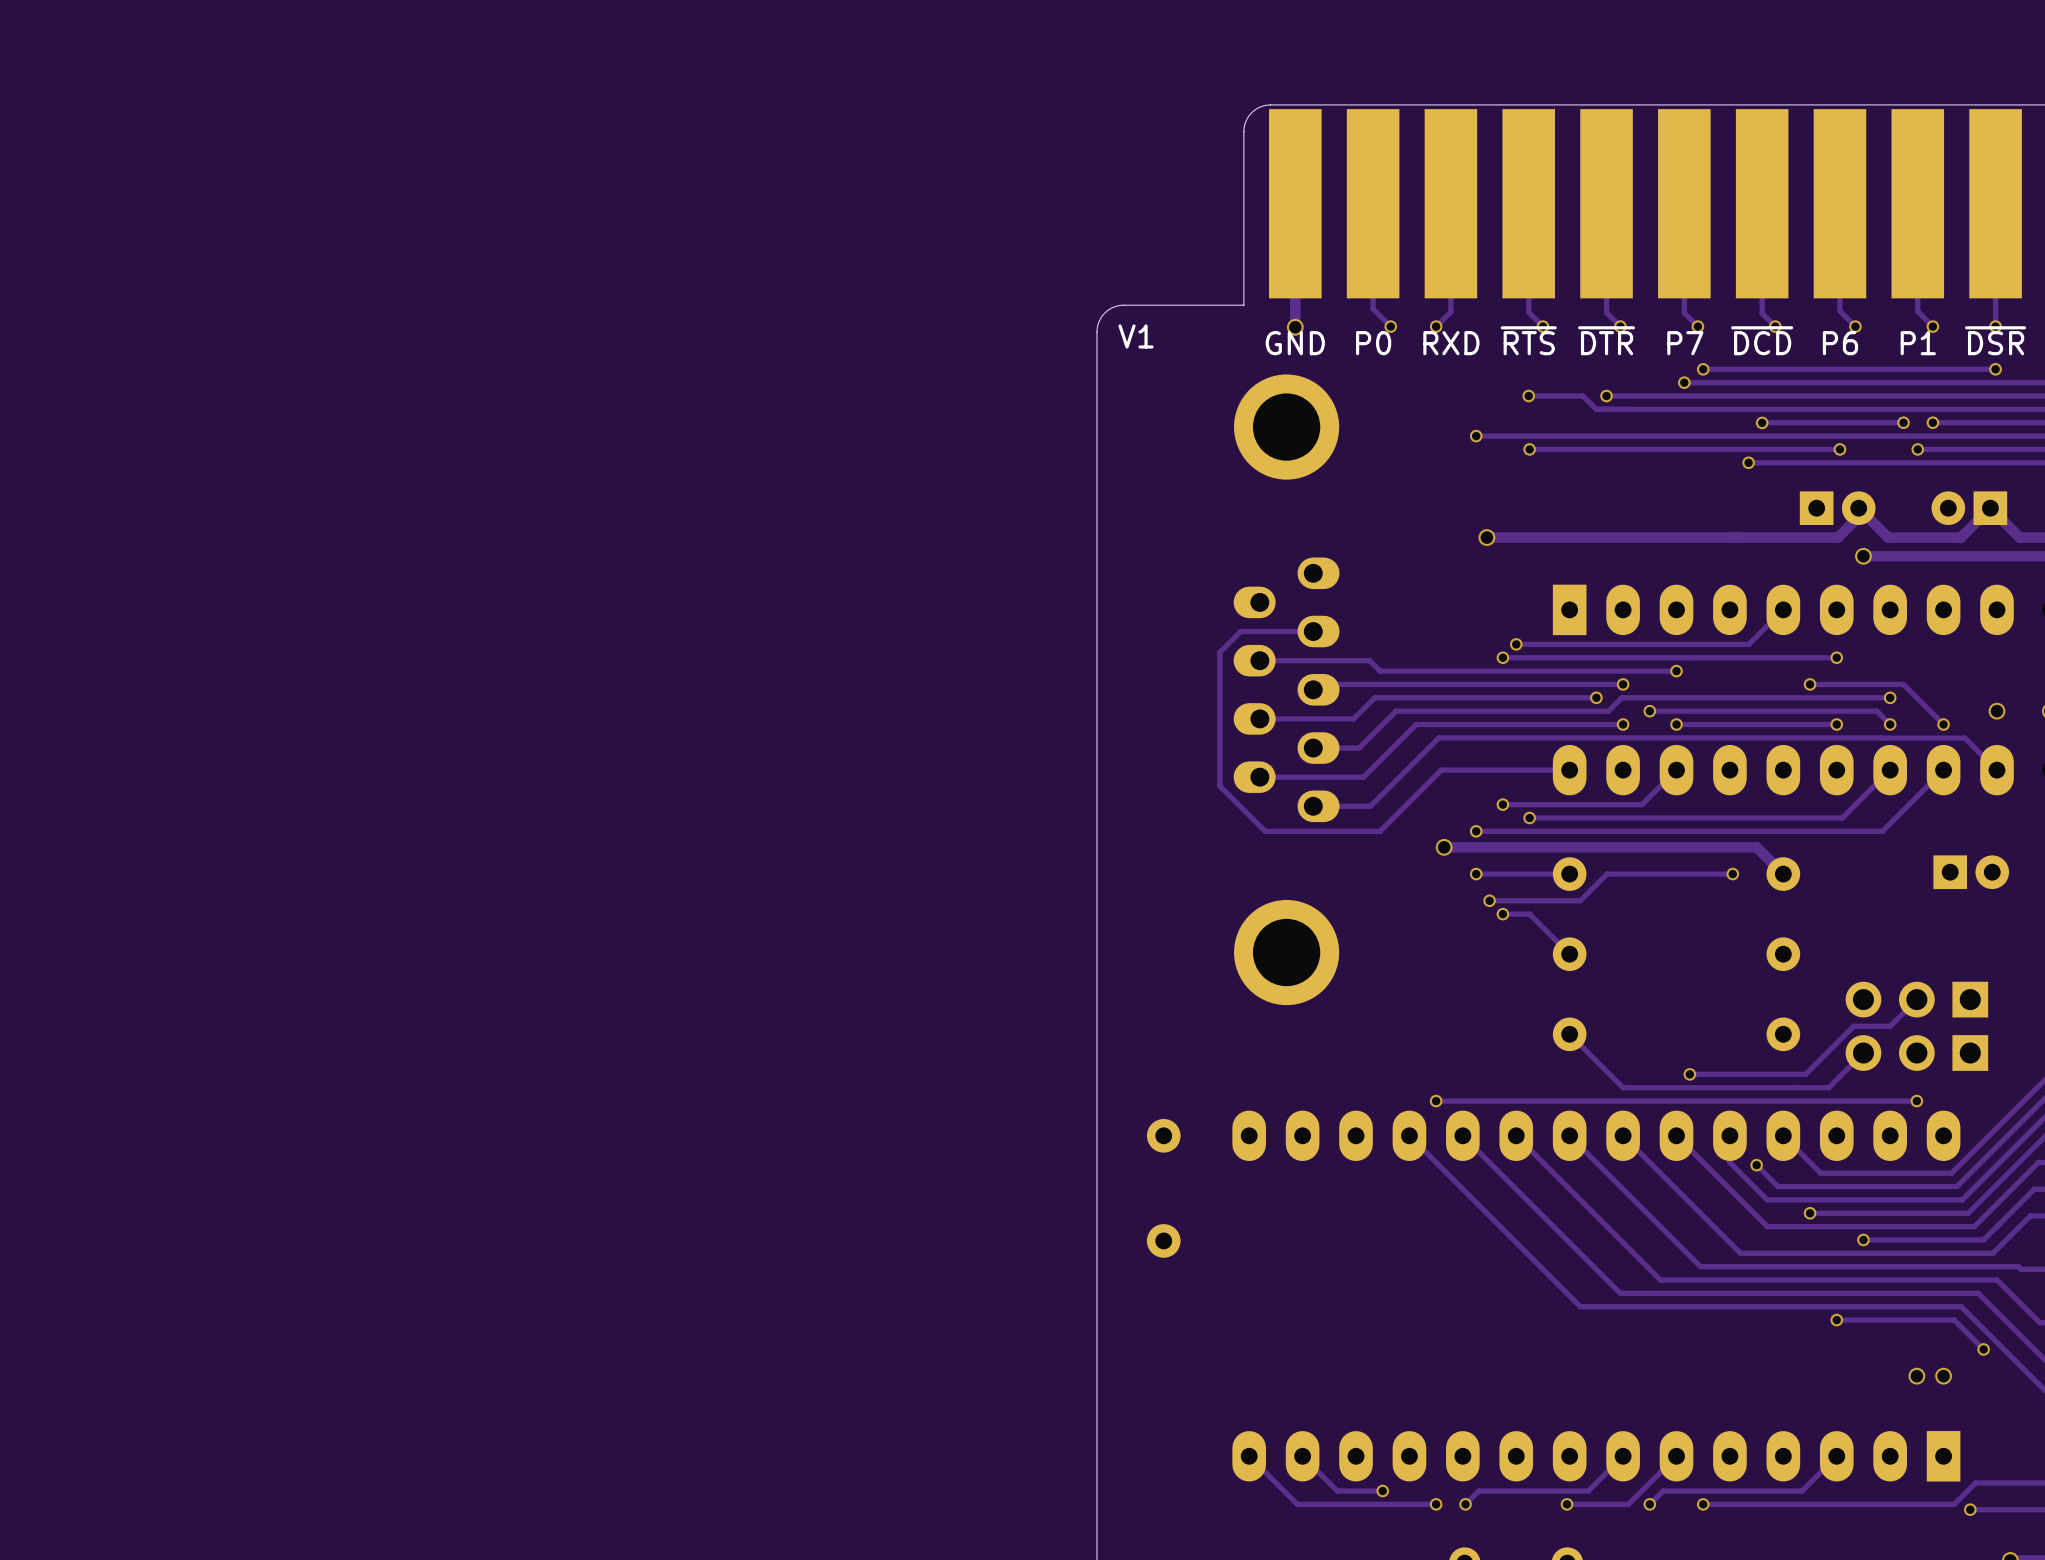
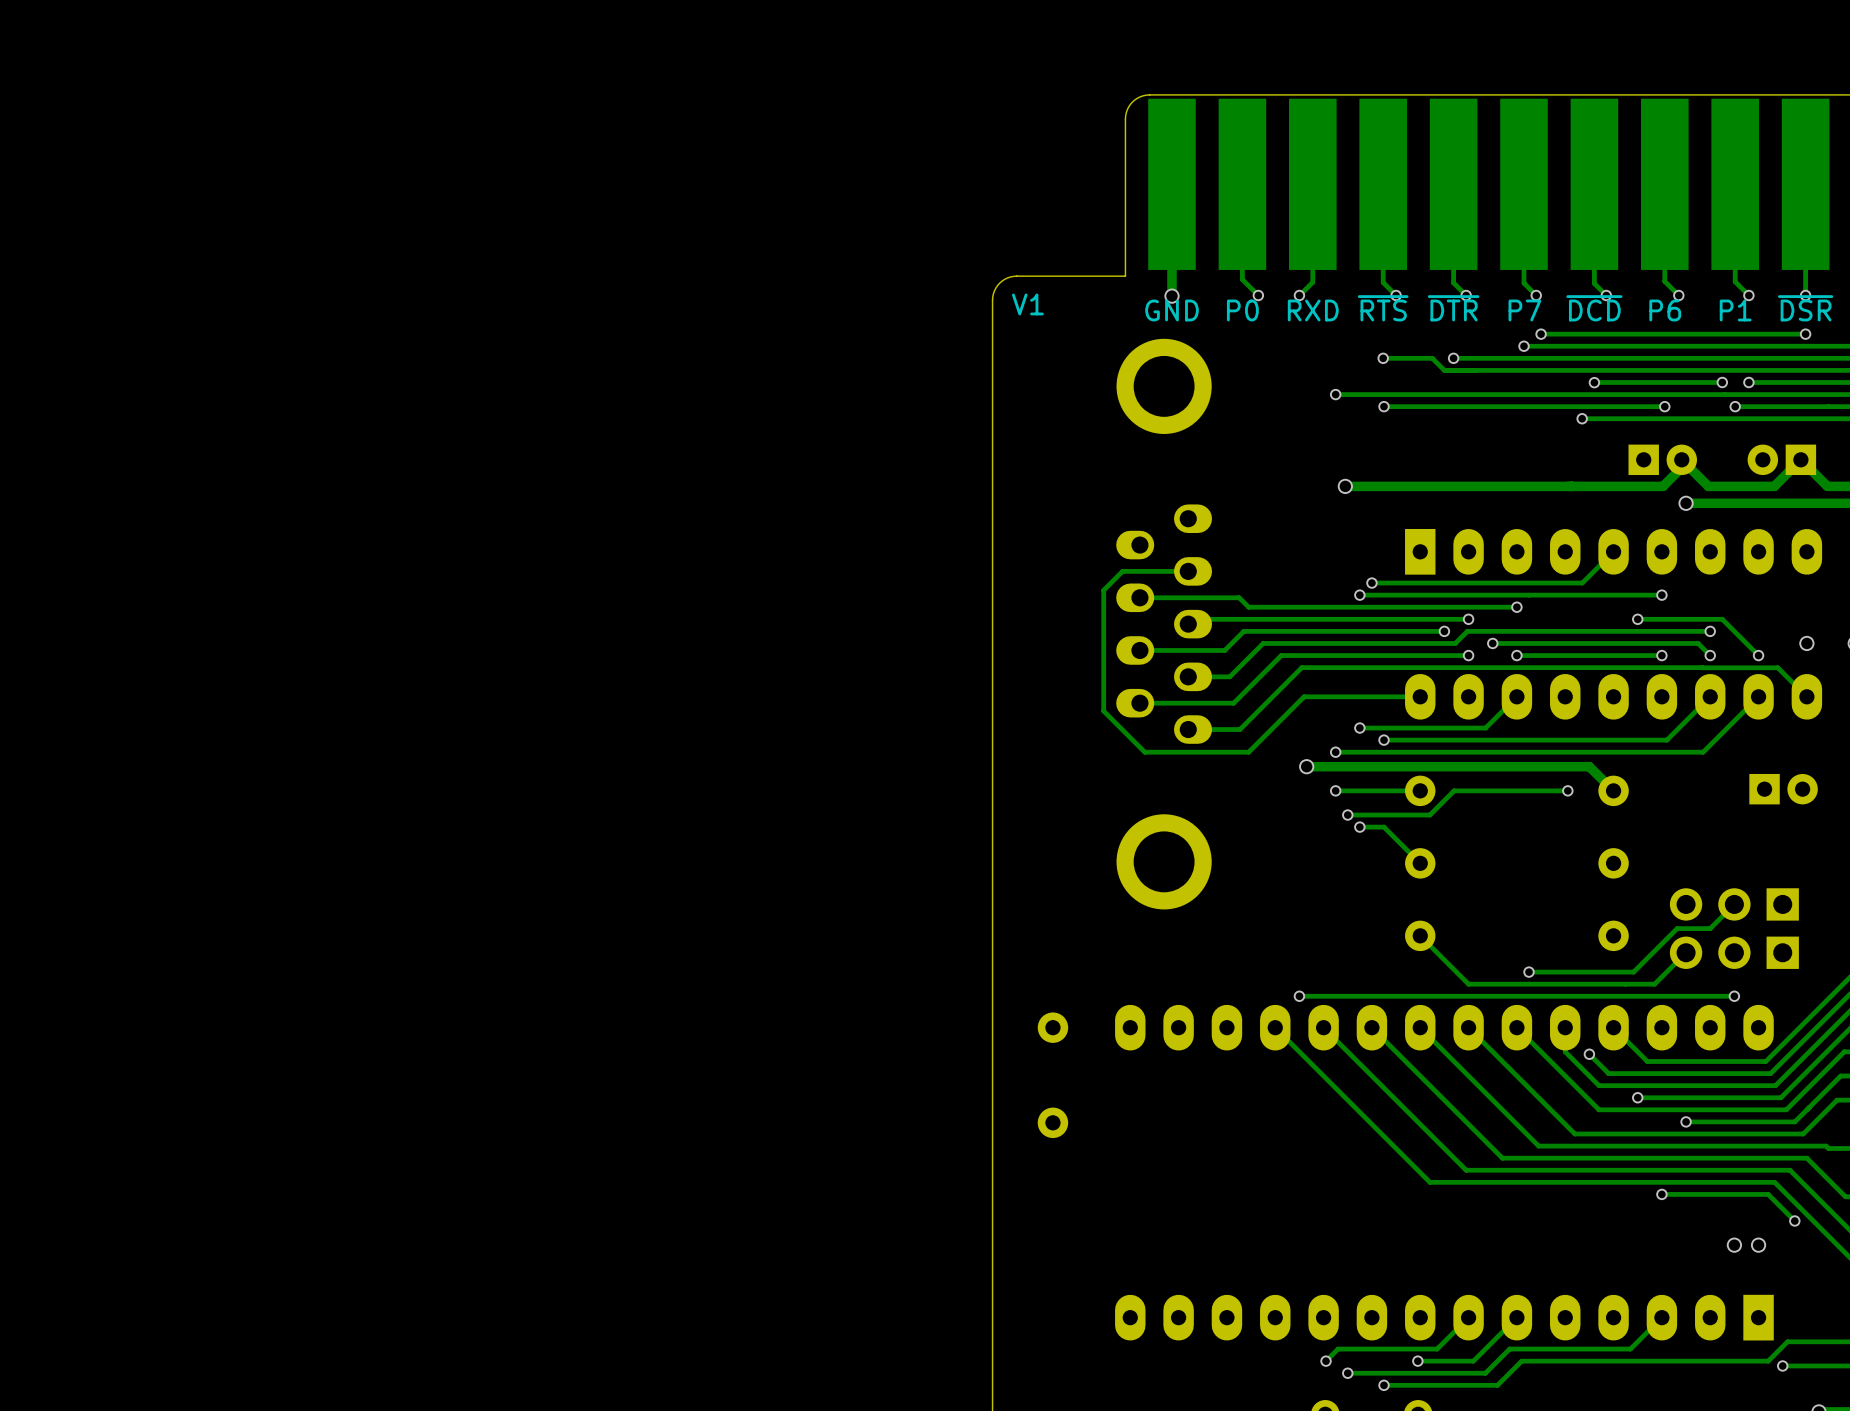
track: (1249, 1456) (1297, 1504) (1436, 1504) -> none
track: (1302, 1456) (1337, 1491) (1382, 1491) -> none
via: (1382, 1491) -> none
track: (1668, 1491) (1663, 1491) (1649, 1504) -> (1509, 1349) (1485, 1373) (1347, 1373)
via: (1436, 1504) -> none
via: (1649, 1504) -> none
track: none -> (1541, 1361) (1521, 1361) (1497, 1385) (1384, 1385)
via: (1703, 1504) -> none
via: none -> (1347, 1373)
via: none -> (1384, 1385)

